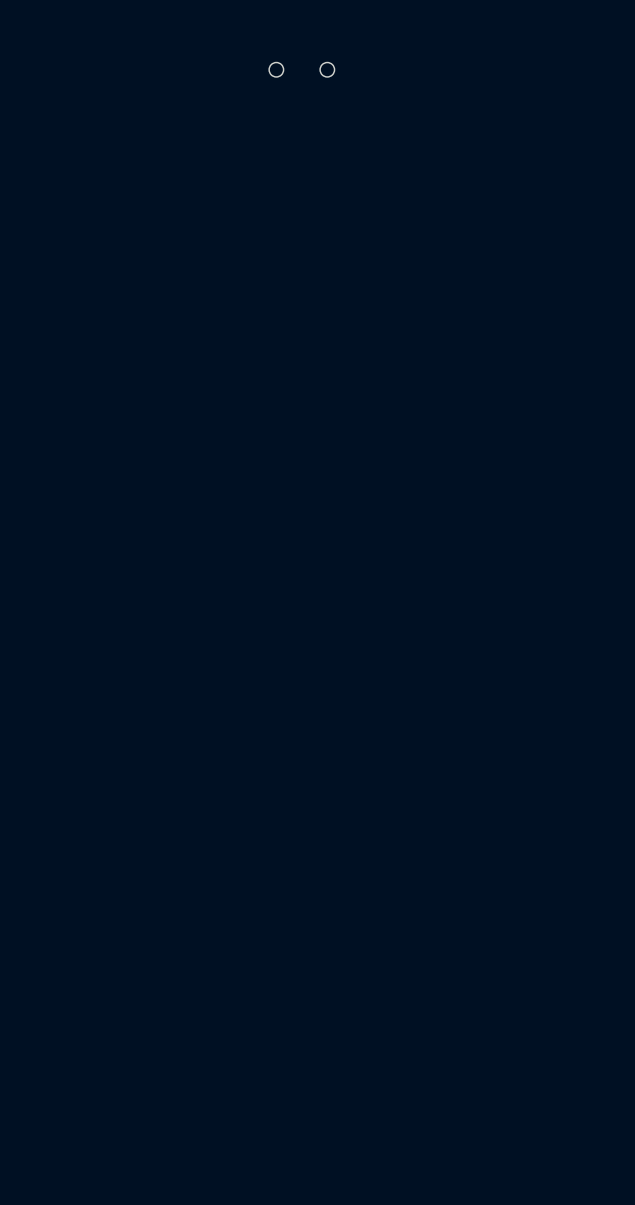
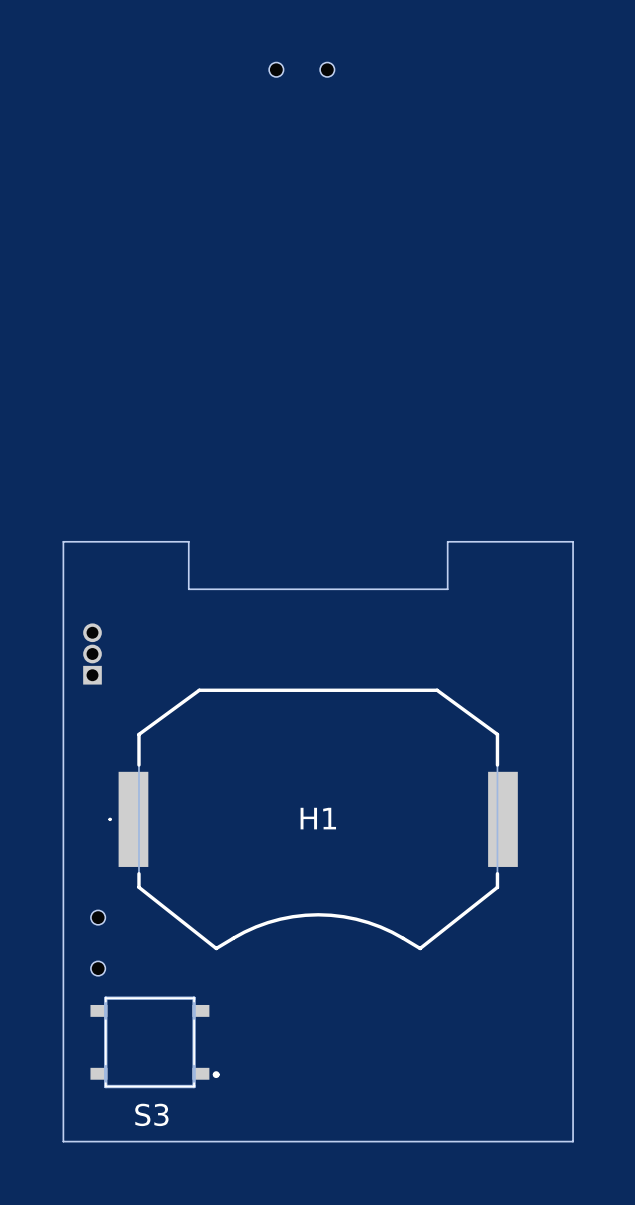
board edge: none -> (573, 541) (573, 1141) (63, 1141) (63, 541) (188, 541) (188, 589) (447, 589) (447, 541) (573, 541)
part: none -> (92, 653)
H1: none -> (313, 819)
part: none -> (98, 943)
S3: none -> (155, 1042)

